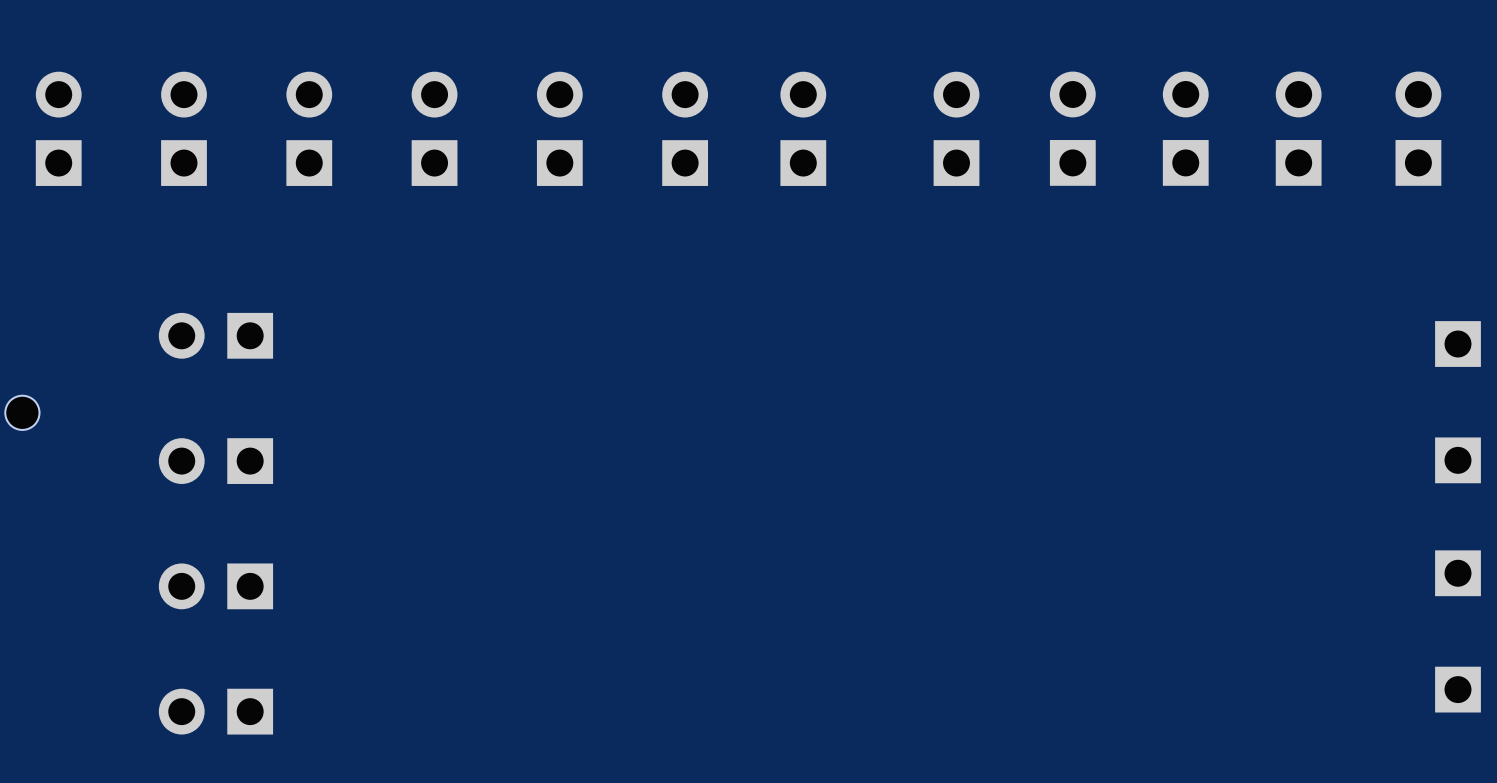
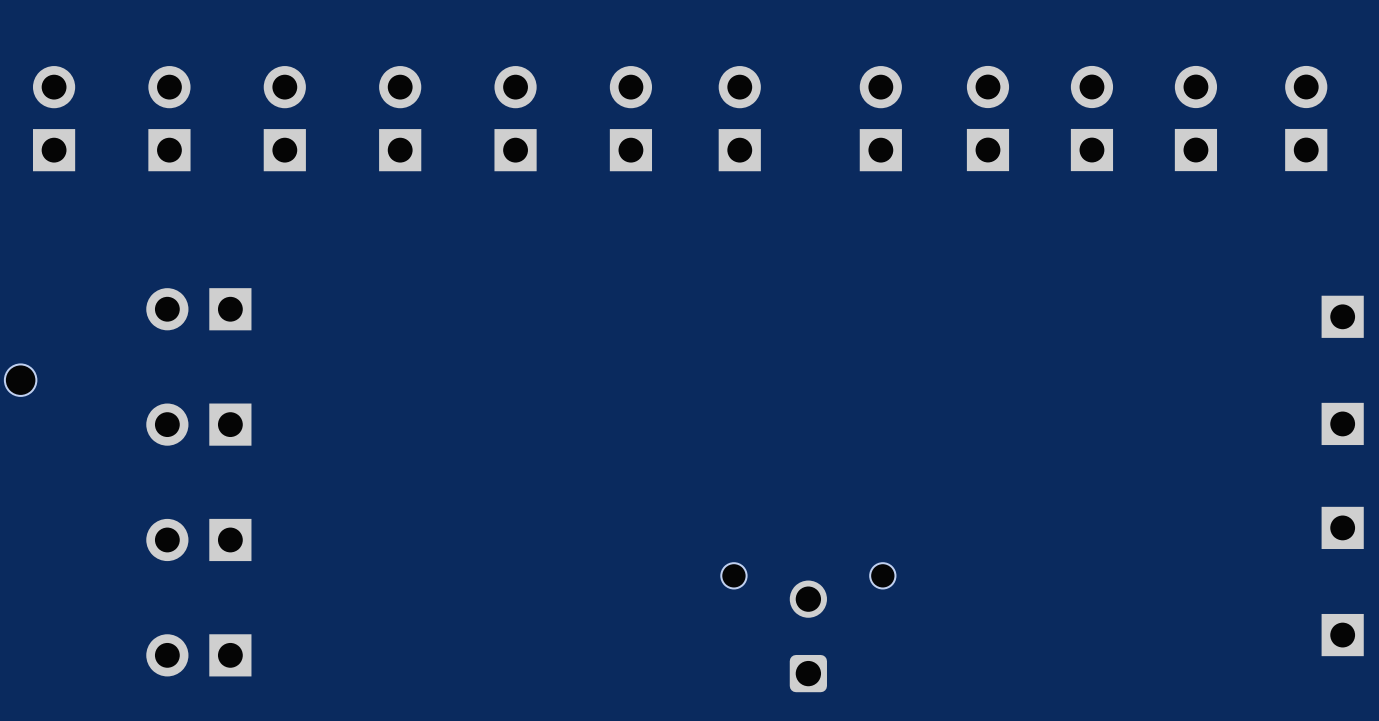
part: none -> (808, 627)

